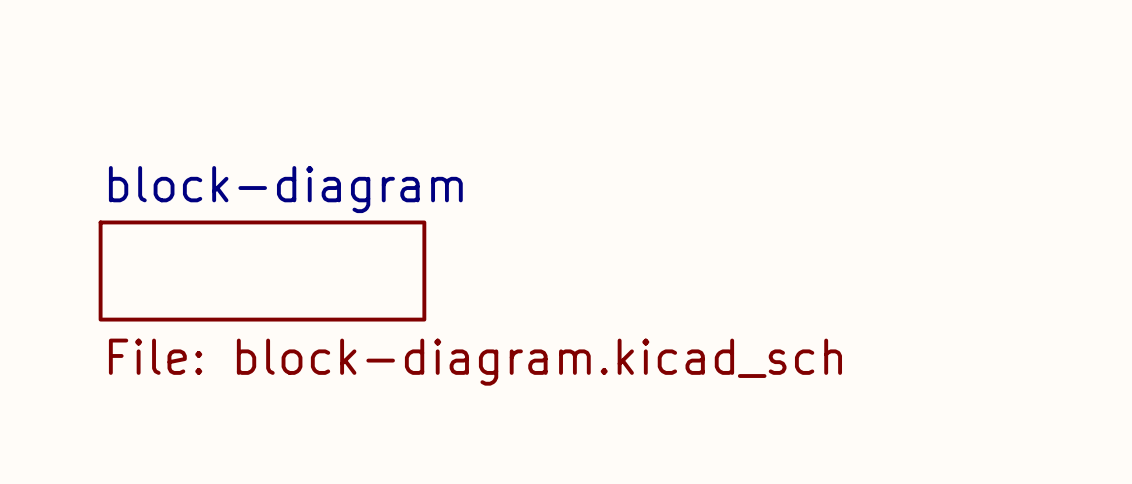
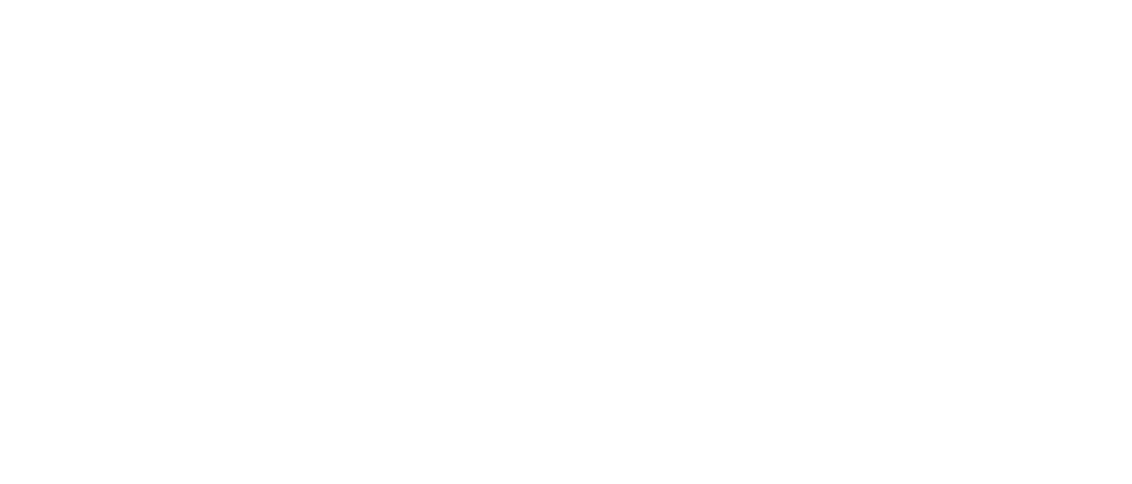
sheet block-diagram: File: block-diagram.kicad_sch (262, 271) -> none

